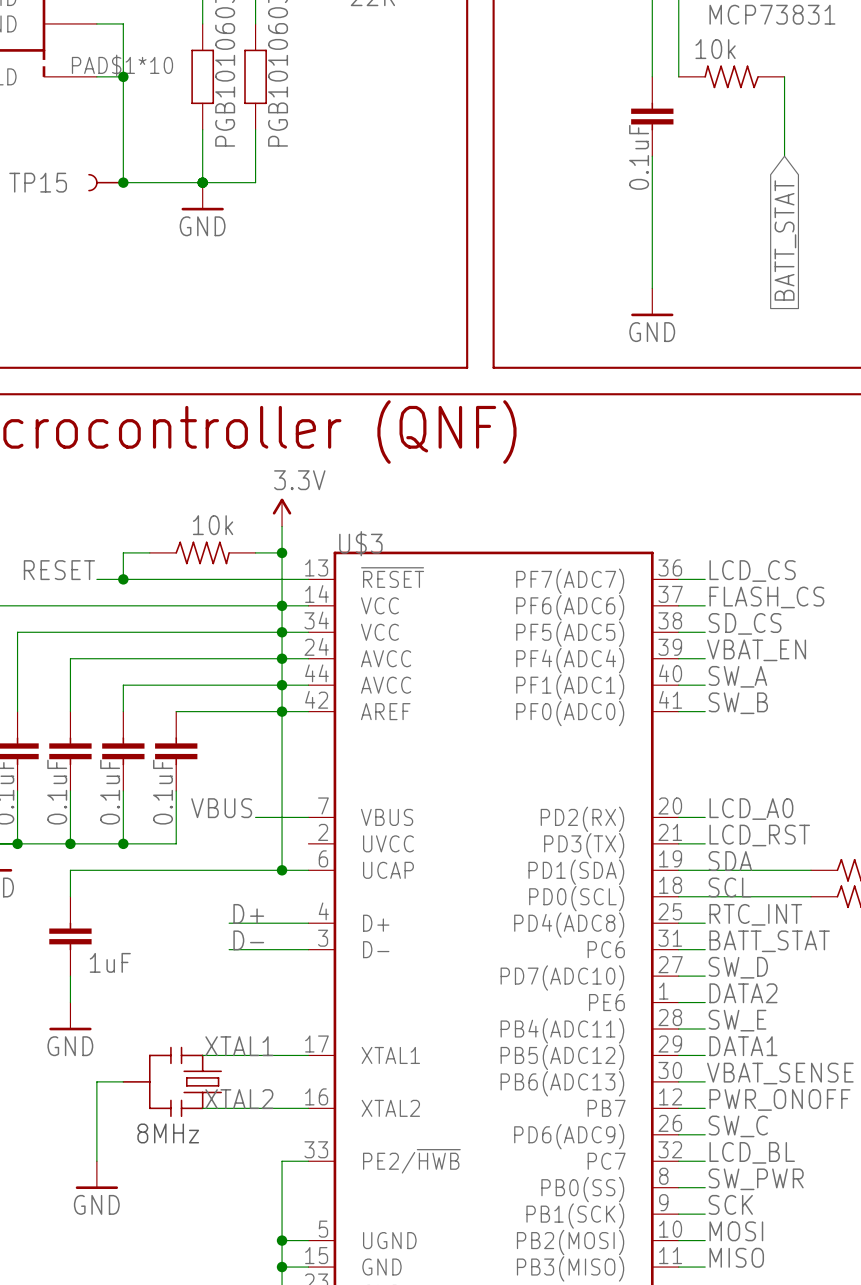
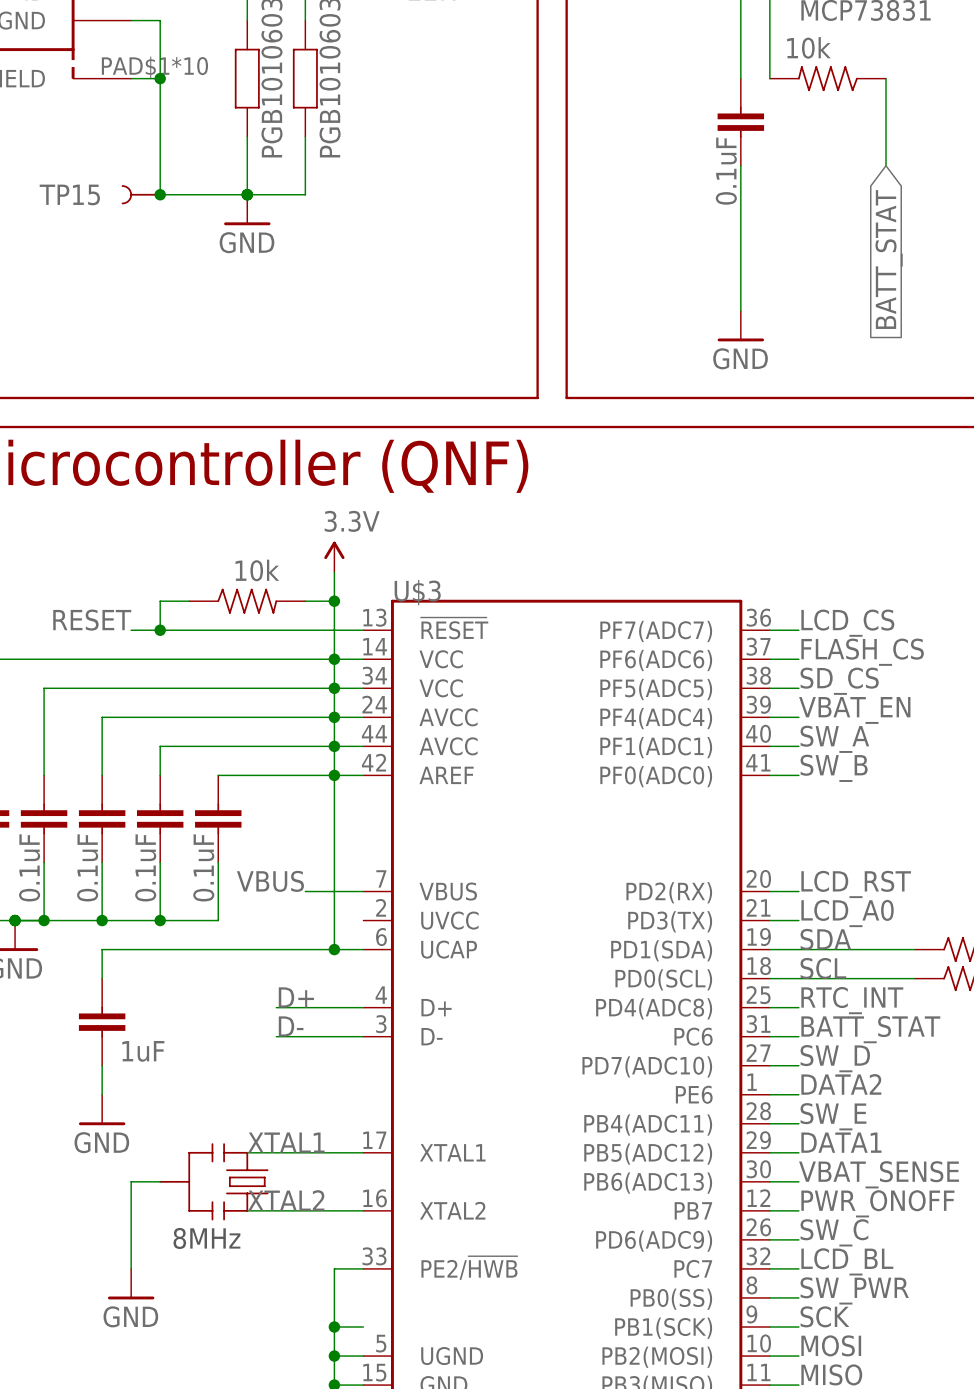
label: LCD_A0 (751, 809) -> LCD_RST (856, 884)
label: LCD_RST (759, 835) -> LCD_A0 (847, 913)
wire: none -> (334, 1327) (363, 1327)
junction: none -> (334, 1327)

